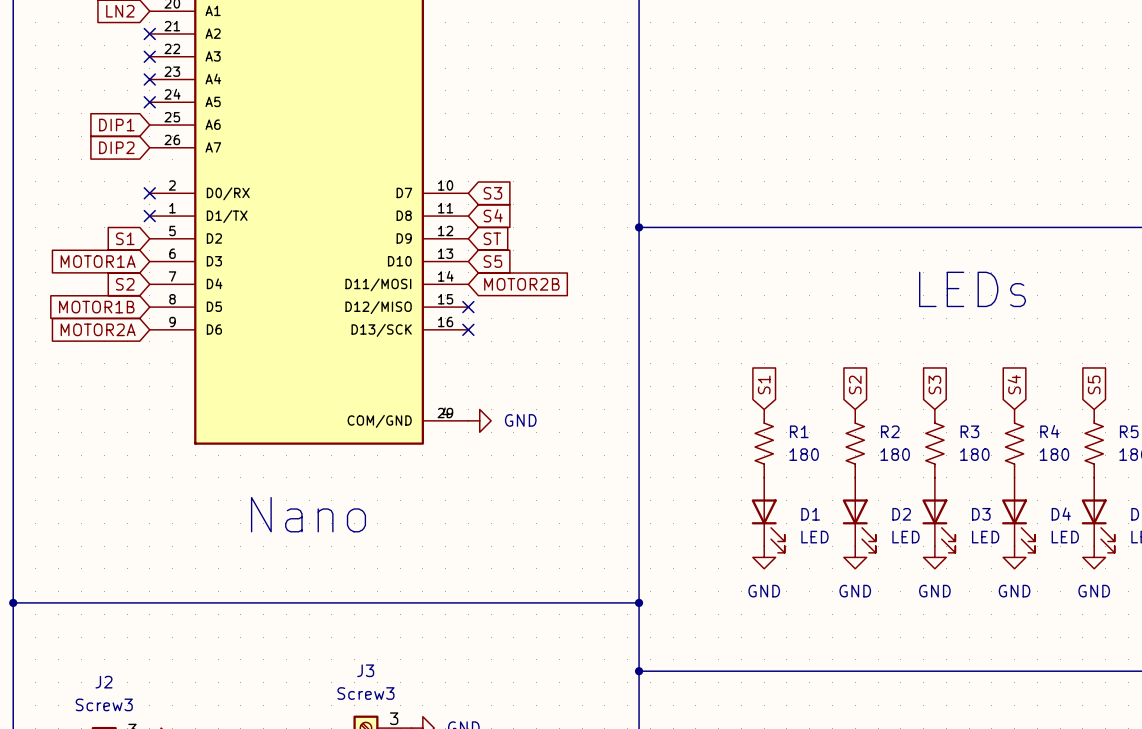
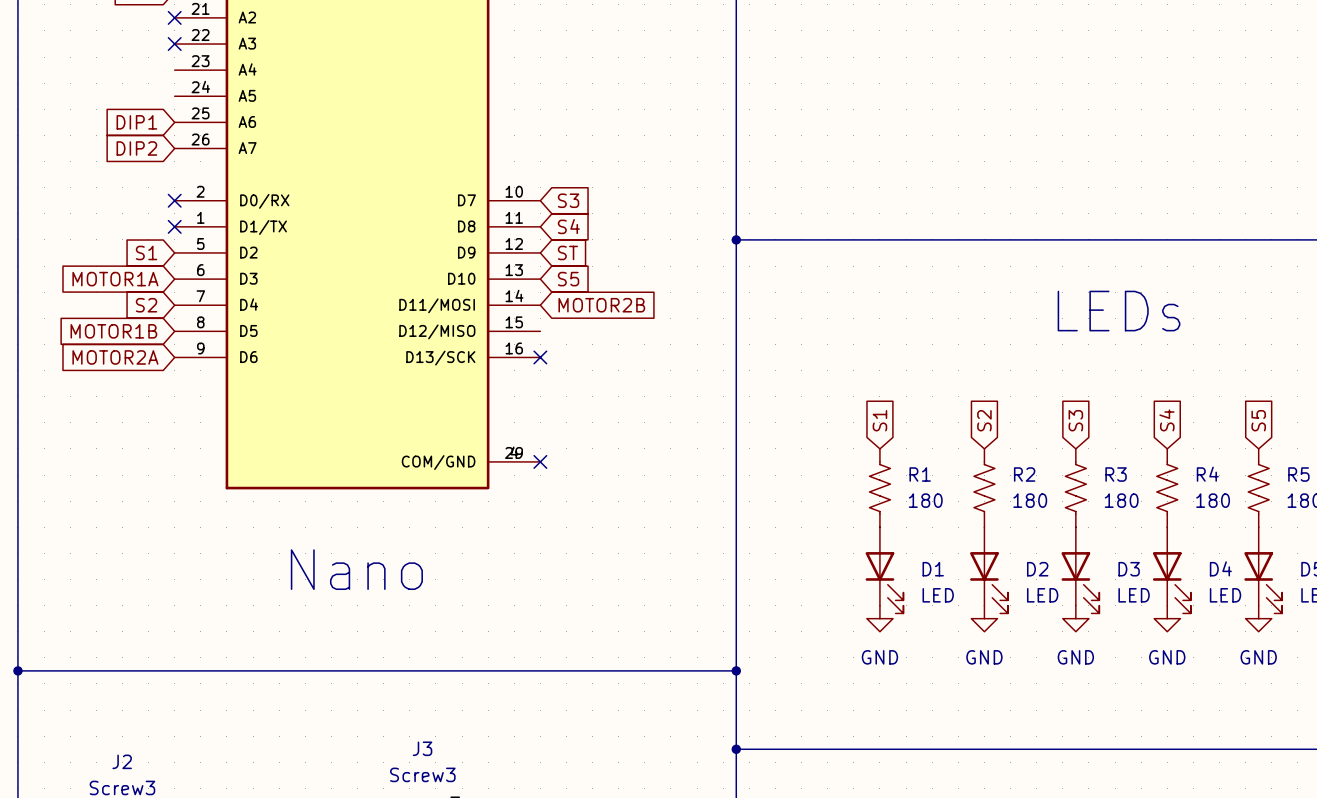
no-connect mark: (149, 79) -> none
no-connect mark: (149, 102) -> none
no-connect mark: (468, 307) -> none
no-connect mark: none -> (540, 461)
power symbol: GND (479, 420) -> none

